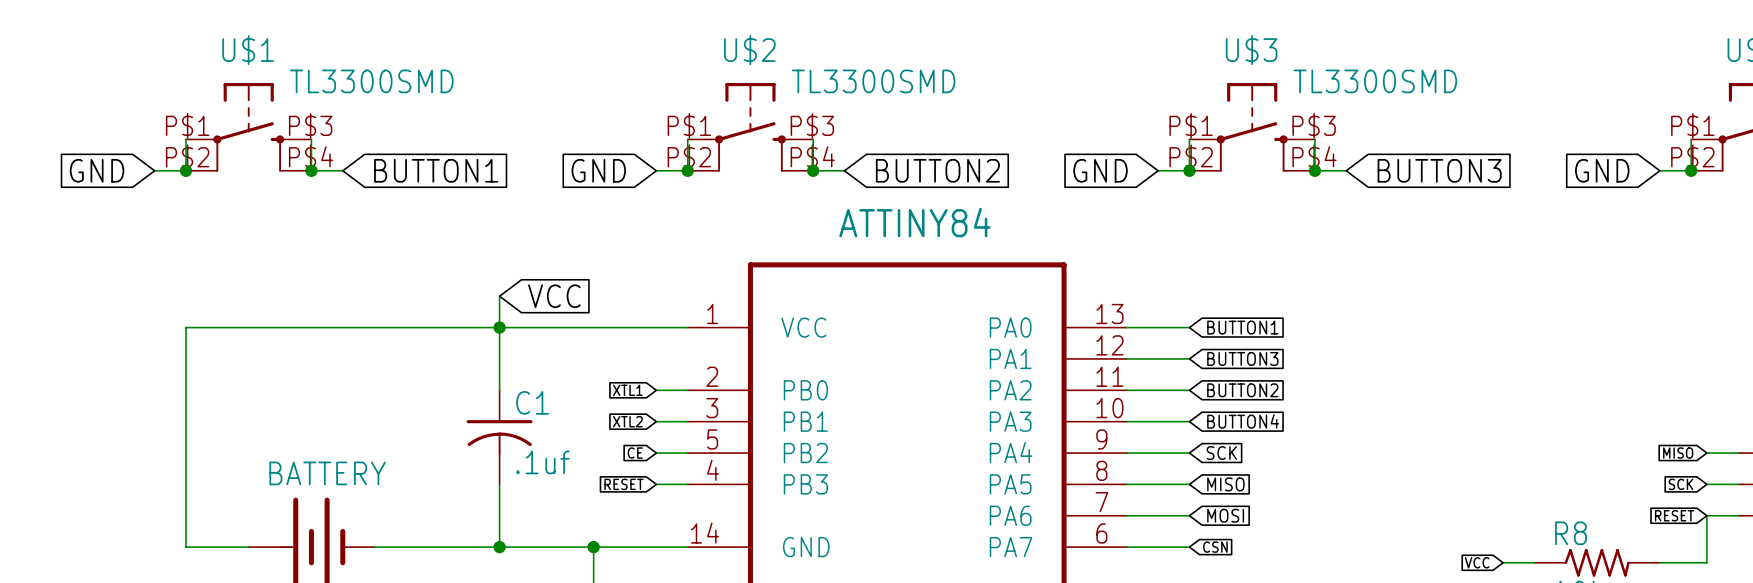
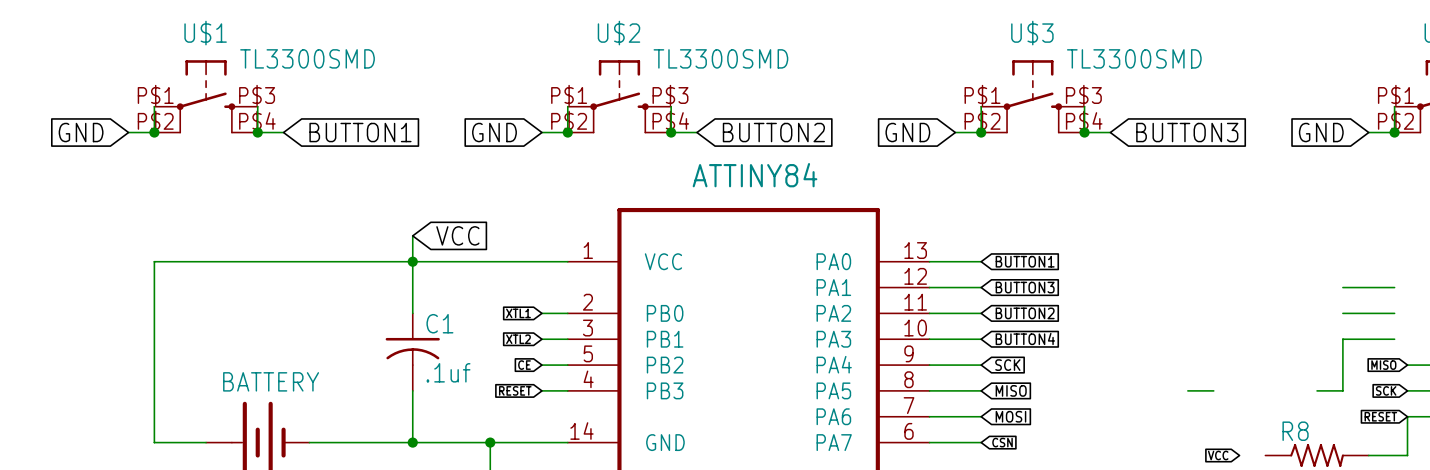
wire: none -> (1342, 287) (1394, 287)
wire: none -> (1342, 313) (1394, 313)
wire: none -> (1394, 339) (1342, 339) (1342, 390) (1317, 390)
wire: (1503, 562) (1534, 562) -> (1187, 390) (1213, 390)

